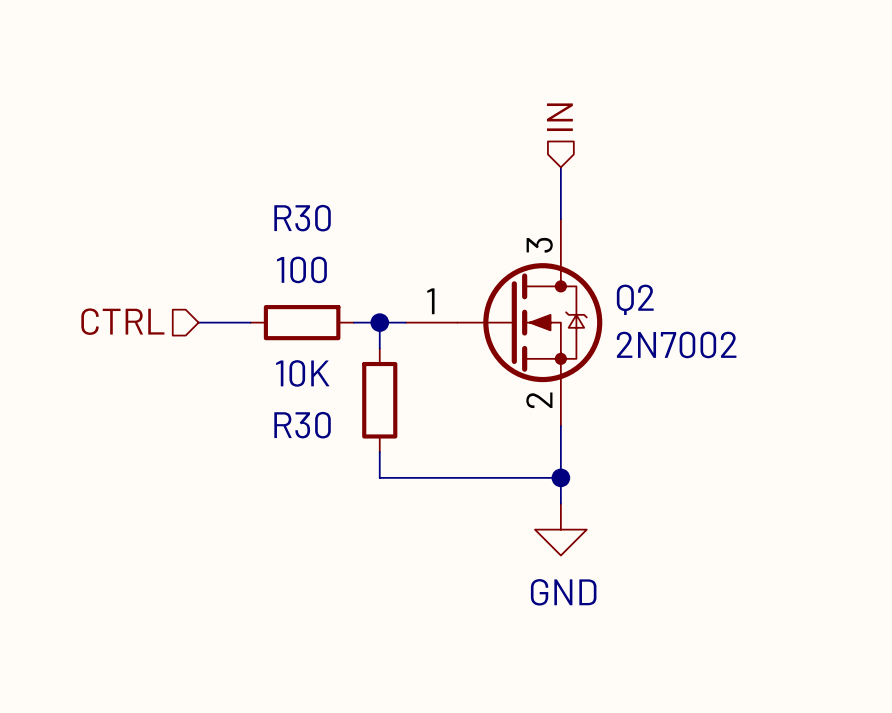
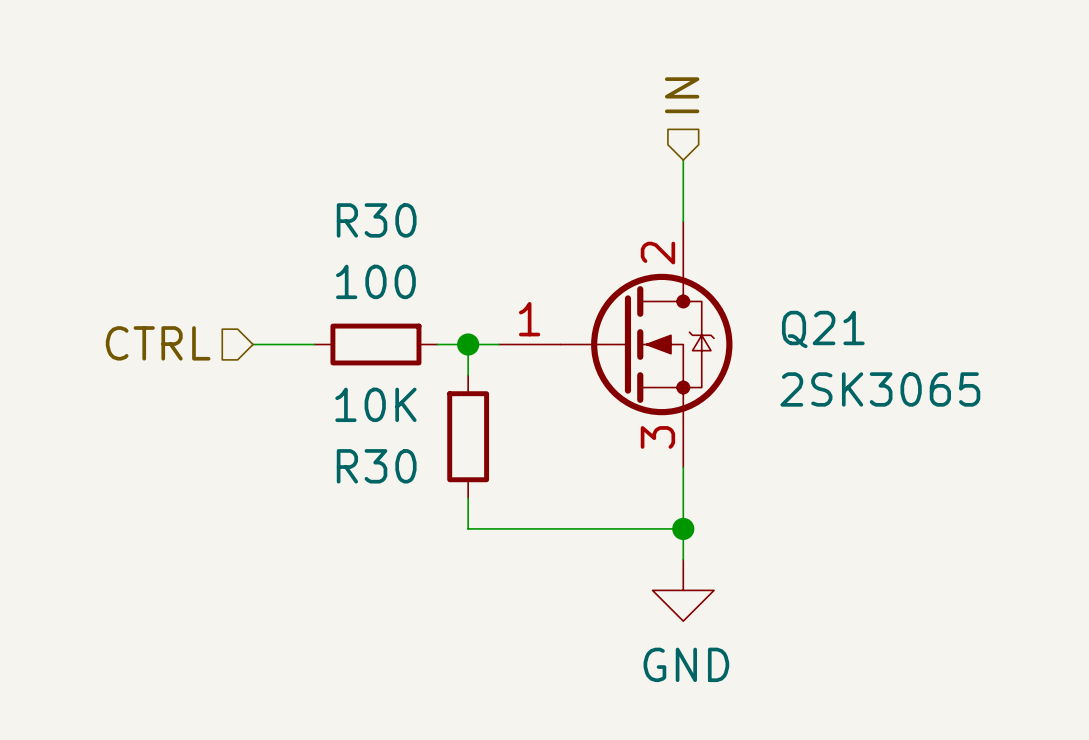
Q2 pin number: 3 (539, 245) -> 2 (657, 253)
Q2 name: Q2 (635, 299) -> Q21 (823, 329)
Q2 value: 2N7002 (676, 344) -> 2SK3065 (880, 389)
Q2 pin number: 2 (539, 400) -> 3 (657, 437)

